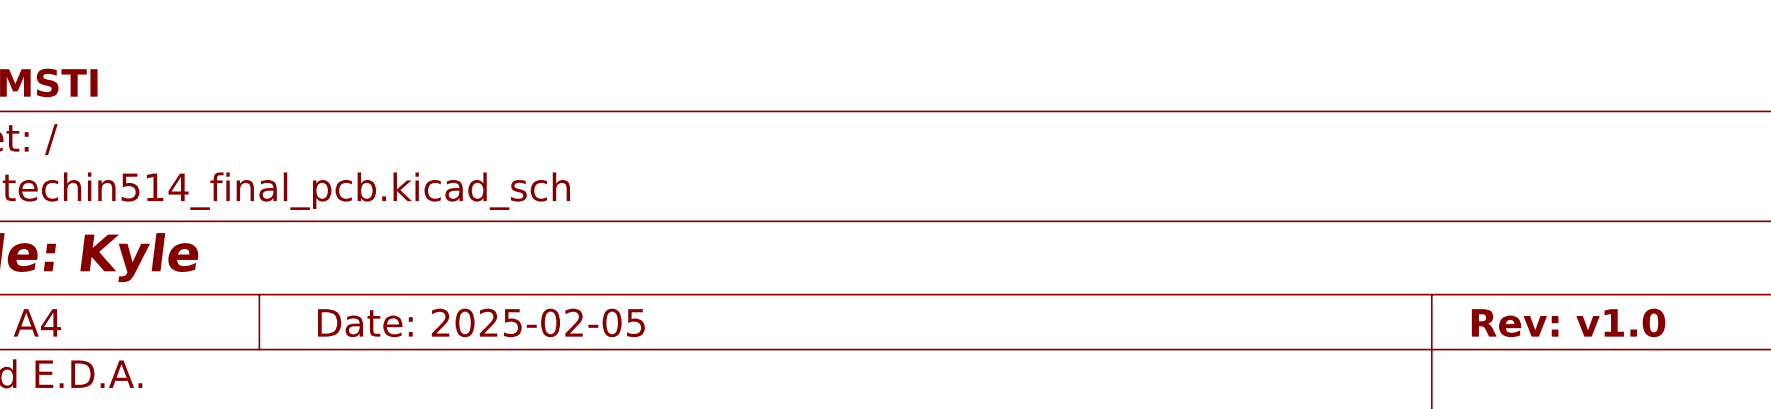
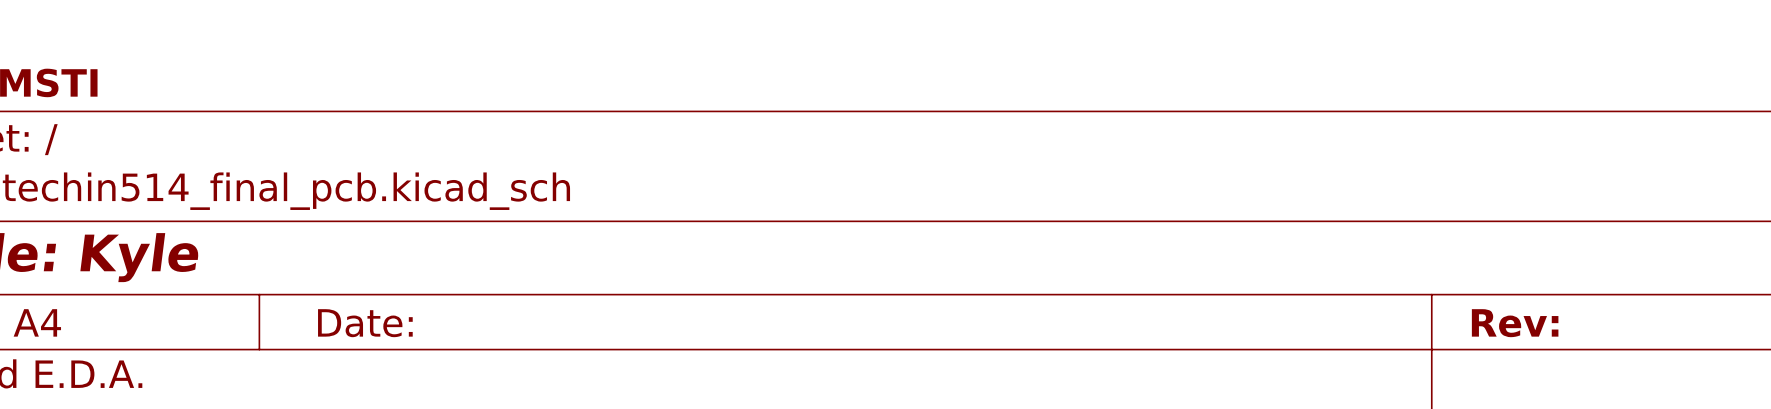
title block: Date: 2025-02-05 (481, 322) -> Date: (365, 323)
title block: Rev: v1.0 (1568, 322) -> Rev: (1515, 323)

